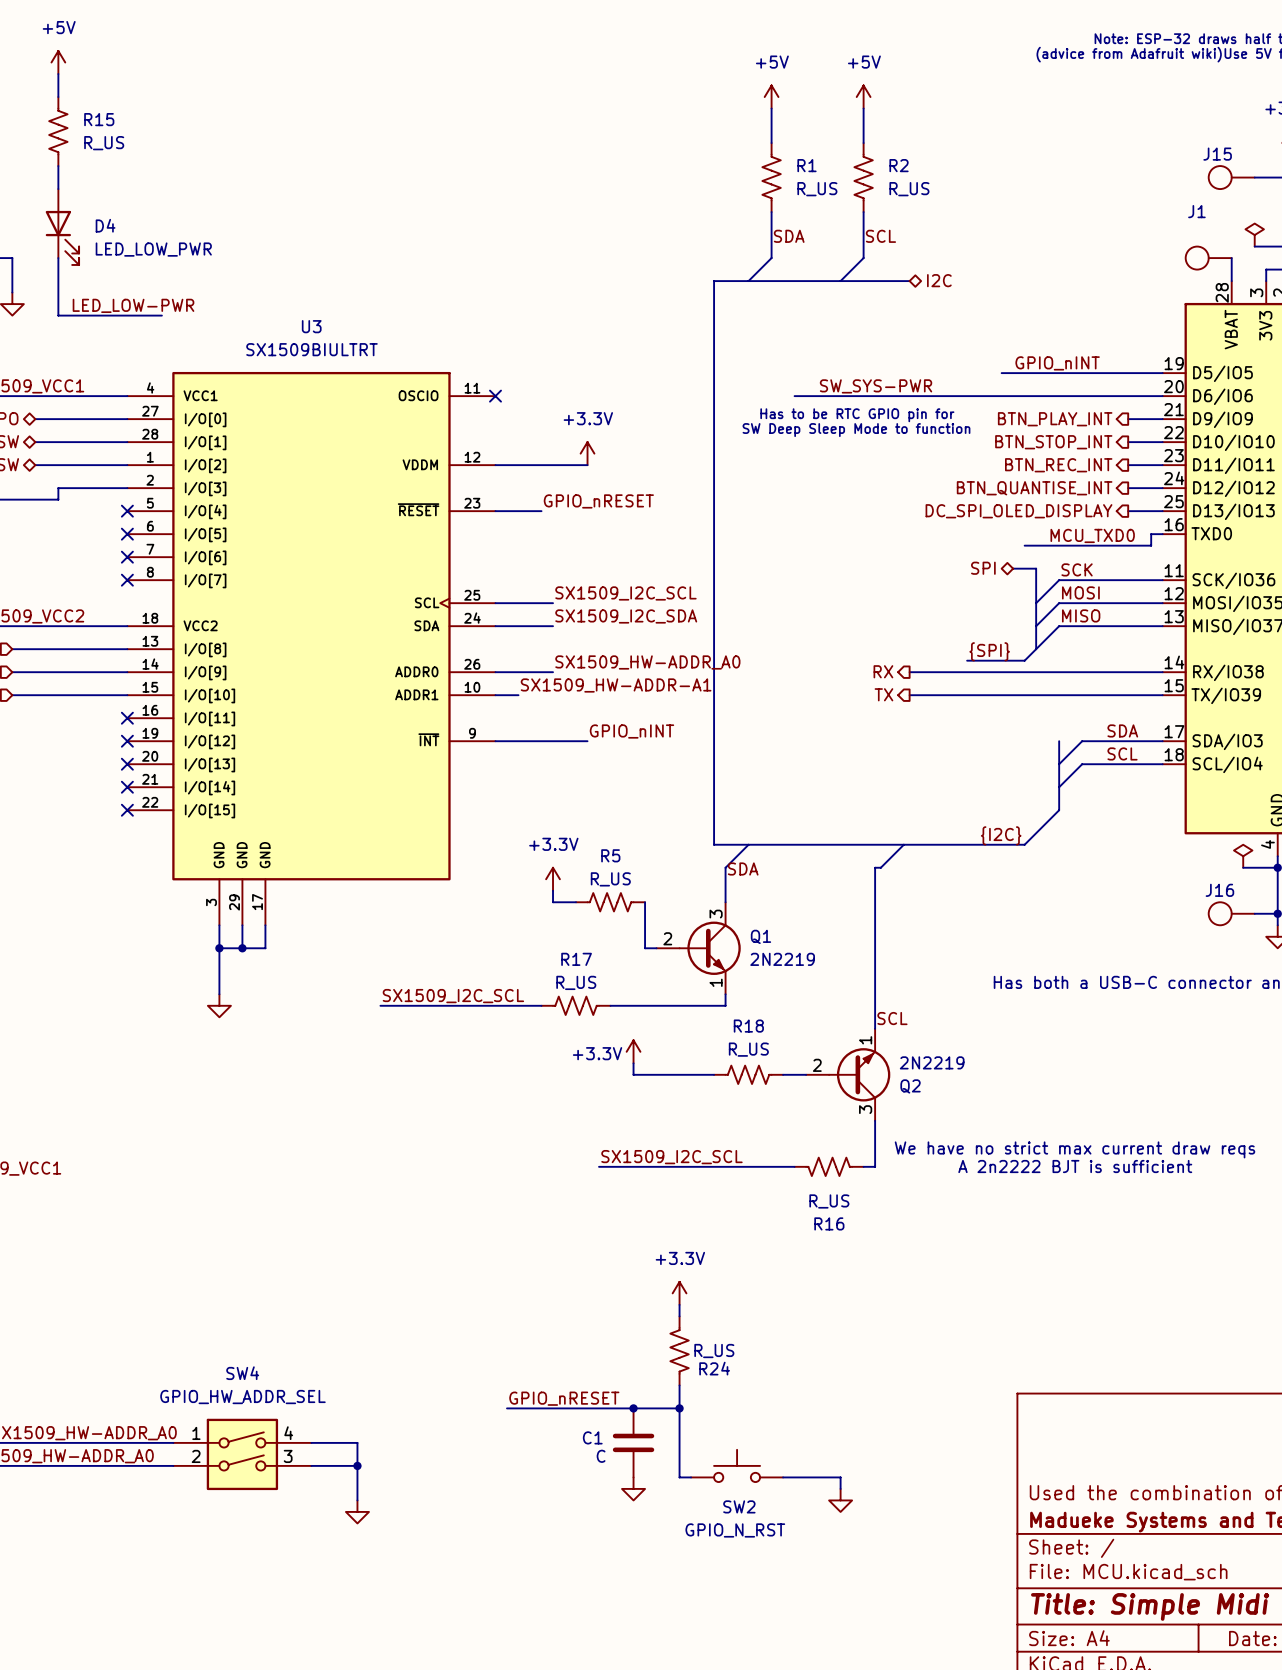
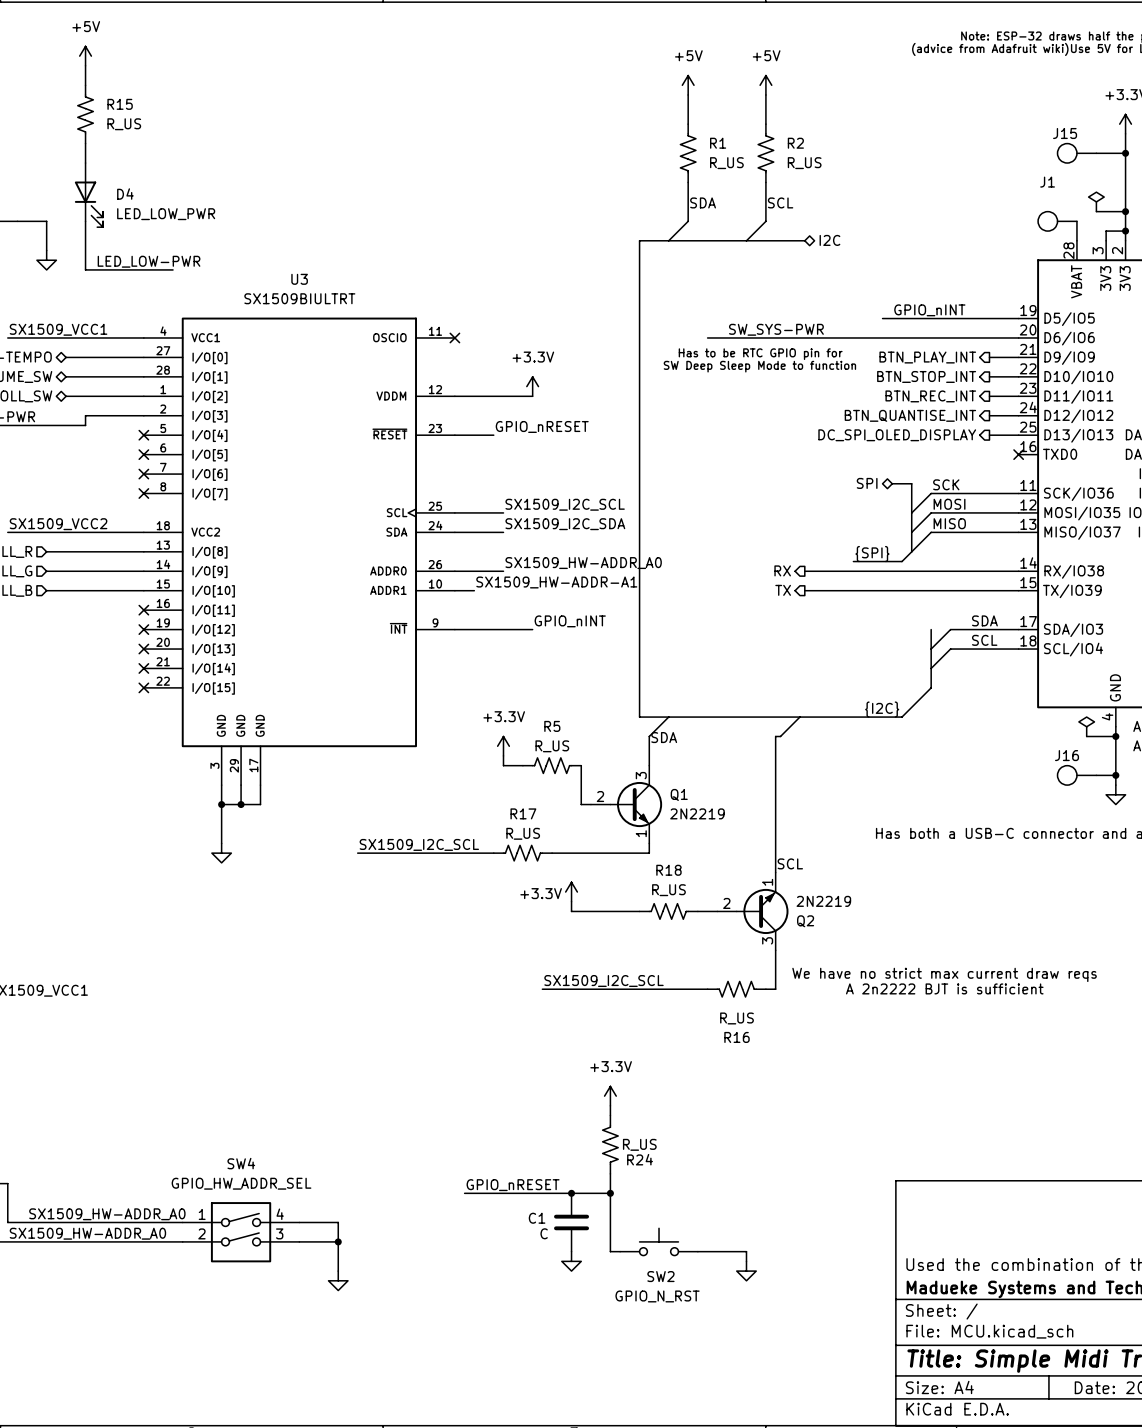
wire: (1162, 534) (1151, 534) (1151, 545) (1024, 545) -> none
no-connect mark: none -> (1018, 454)
label: MCU_TXD0 (1092, 535) -> none

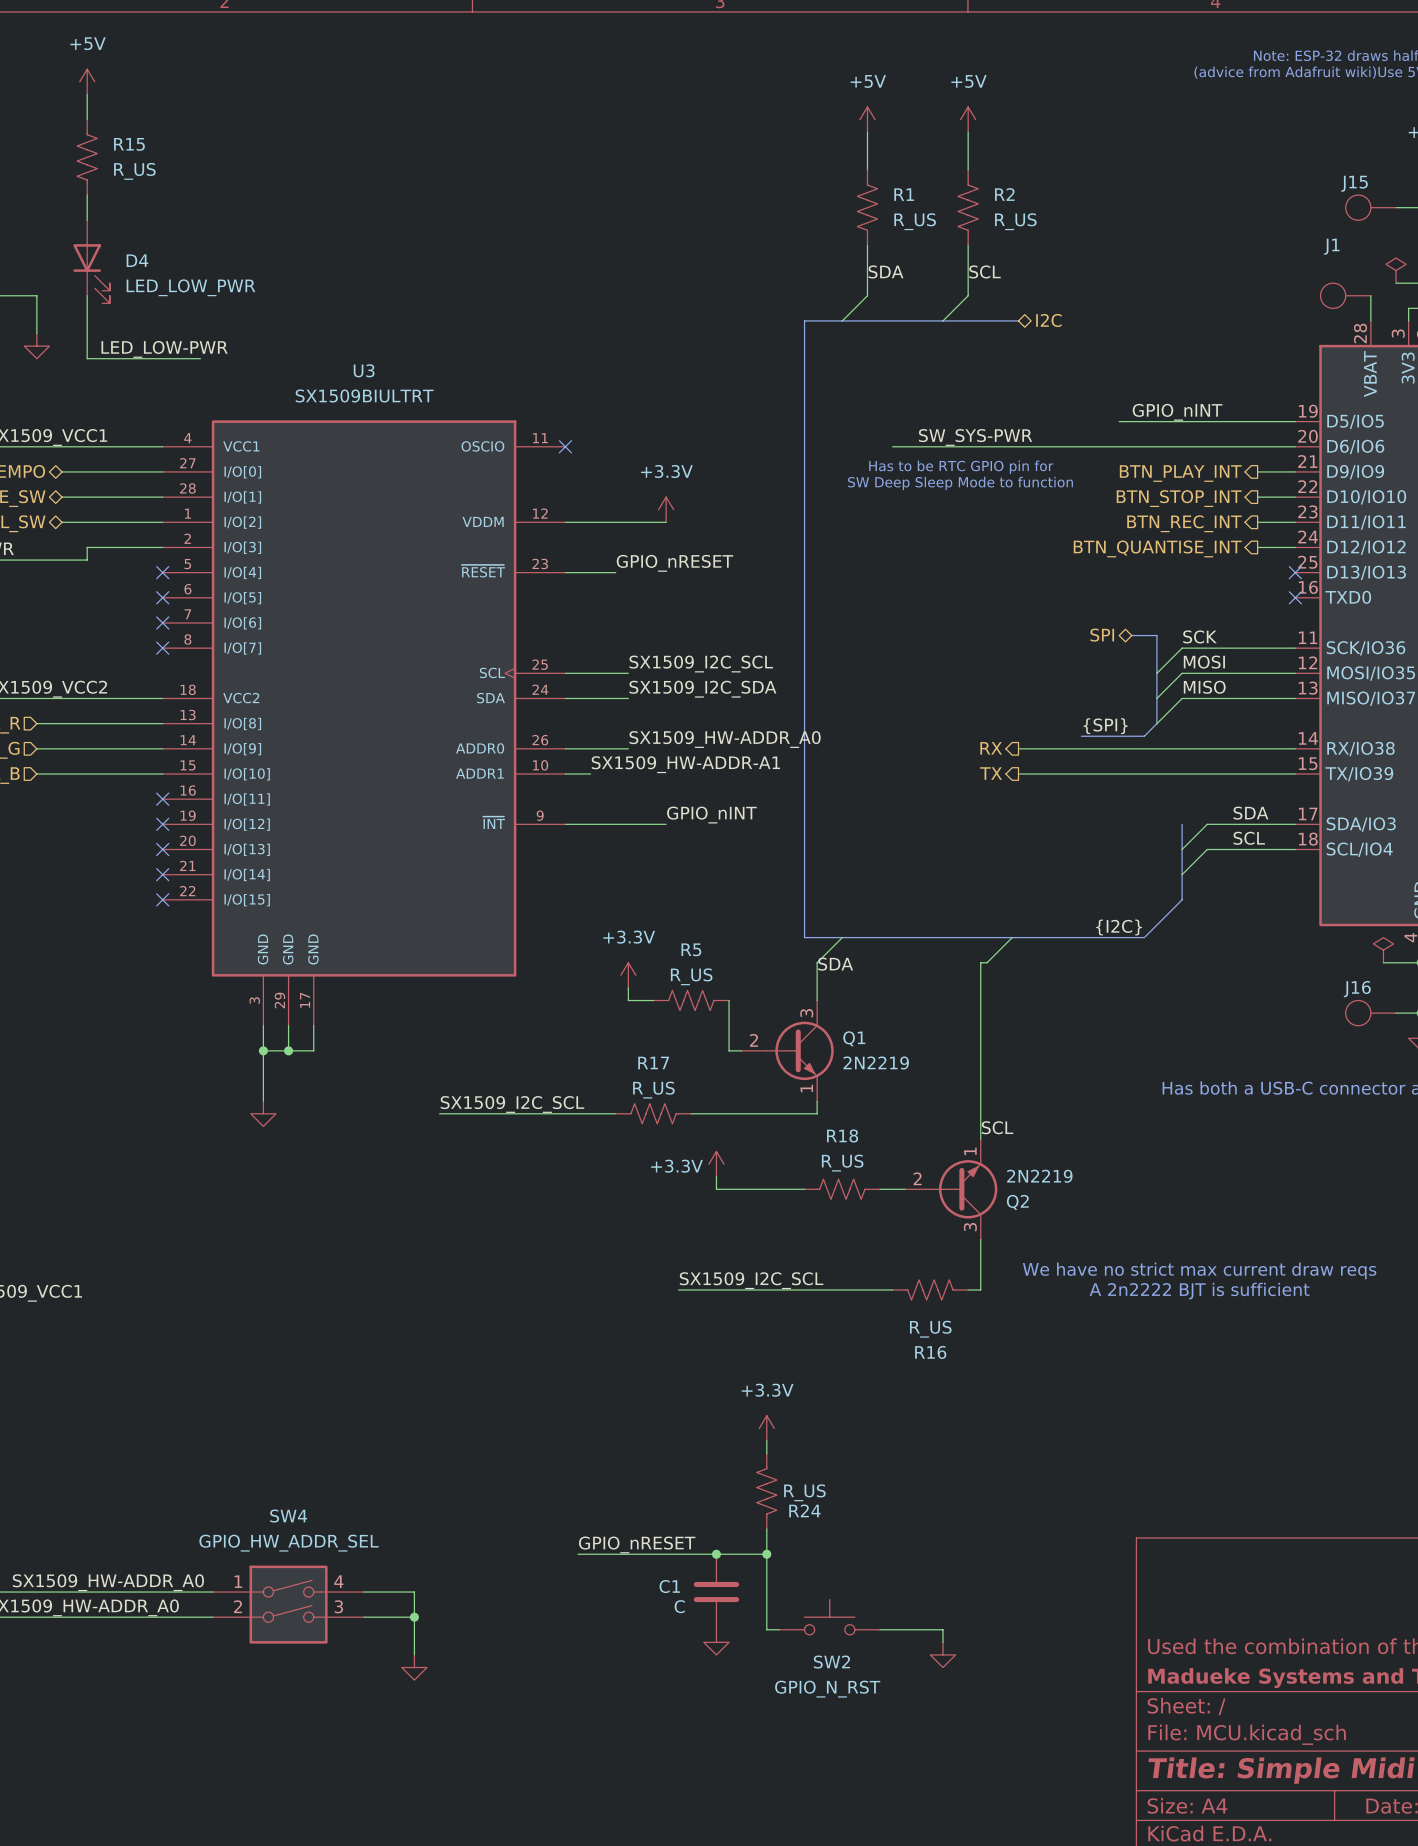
hierarchical label: DC_SPI_OLED_DISPLAY (897, 435) -> none
wire: (989, 435) (1018, 435) -> none
no-connect mark: none -> (1295, 572)

